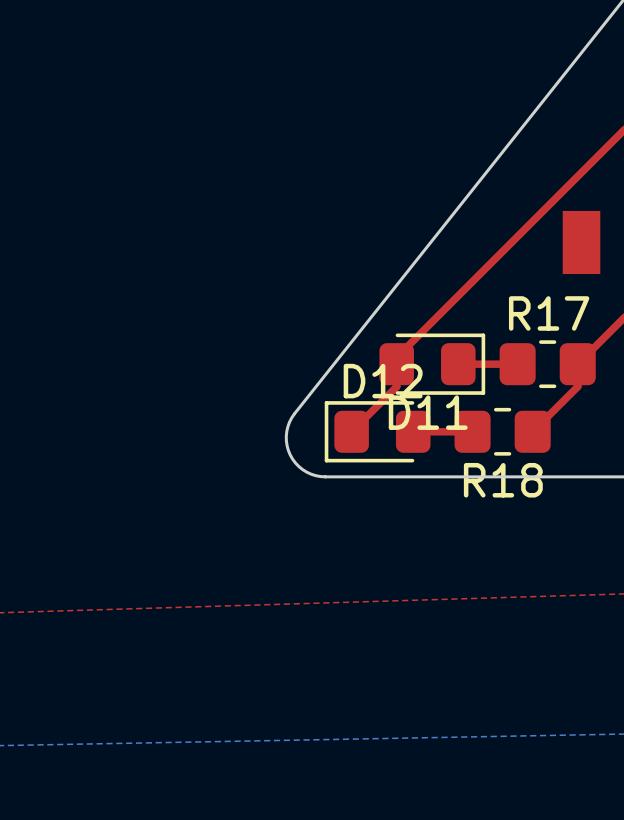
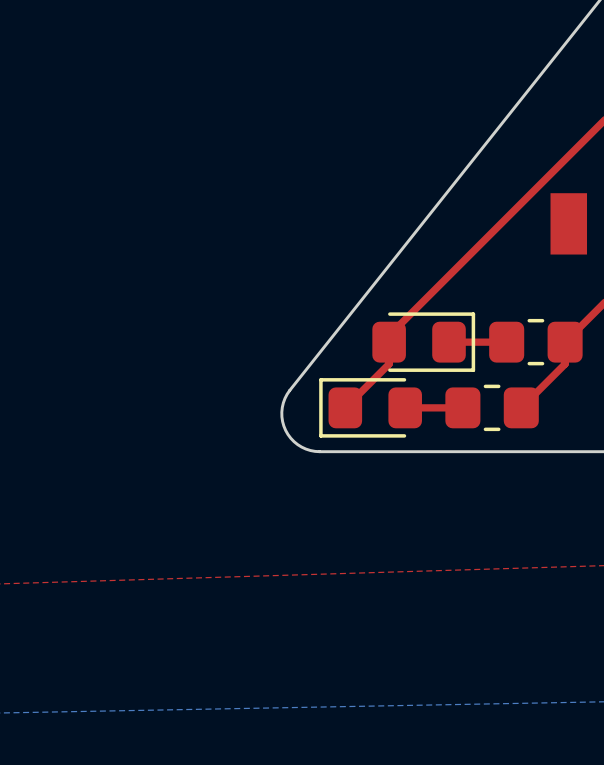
R17 name: R17 (549, 313) -> none
D12 name: D12 (383, 381) -> none
D11 name: D11 (428, 412) -> none
R18 name: R18 (503, 480) -> none

